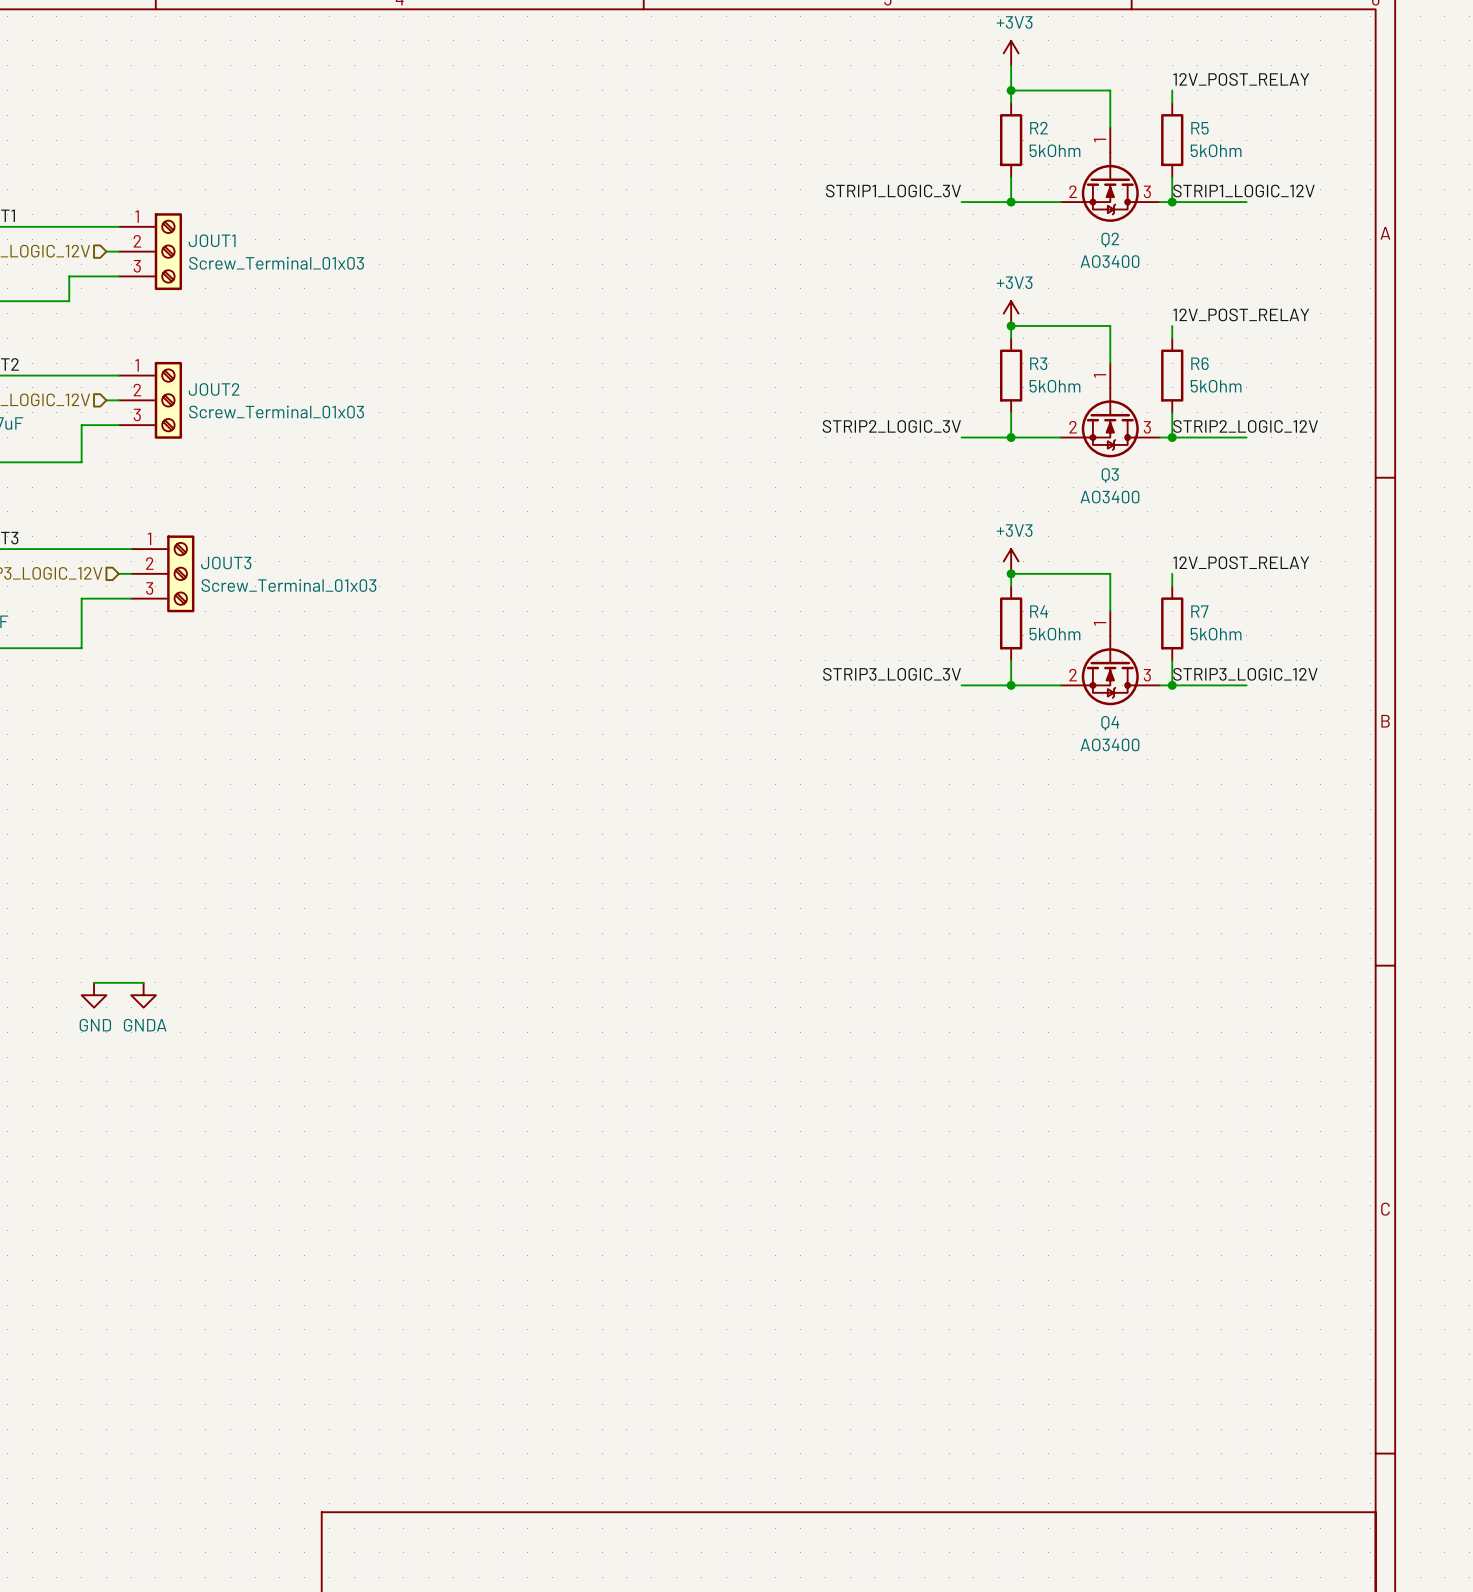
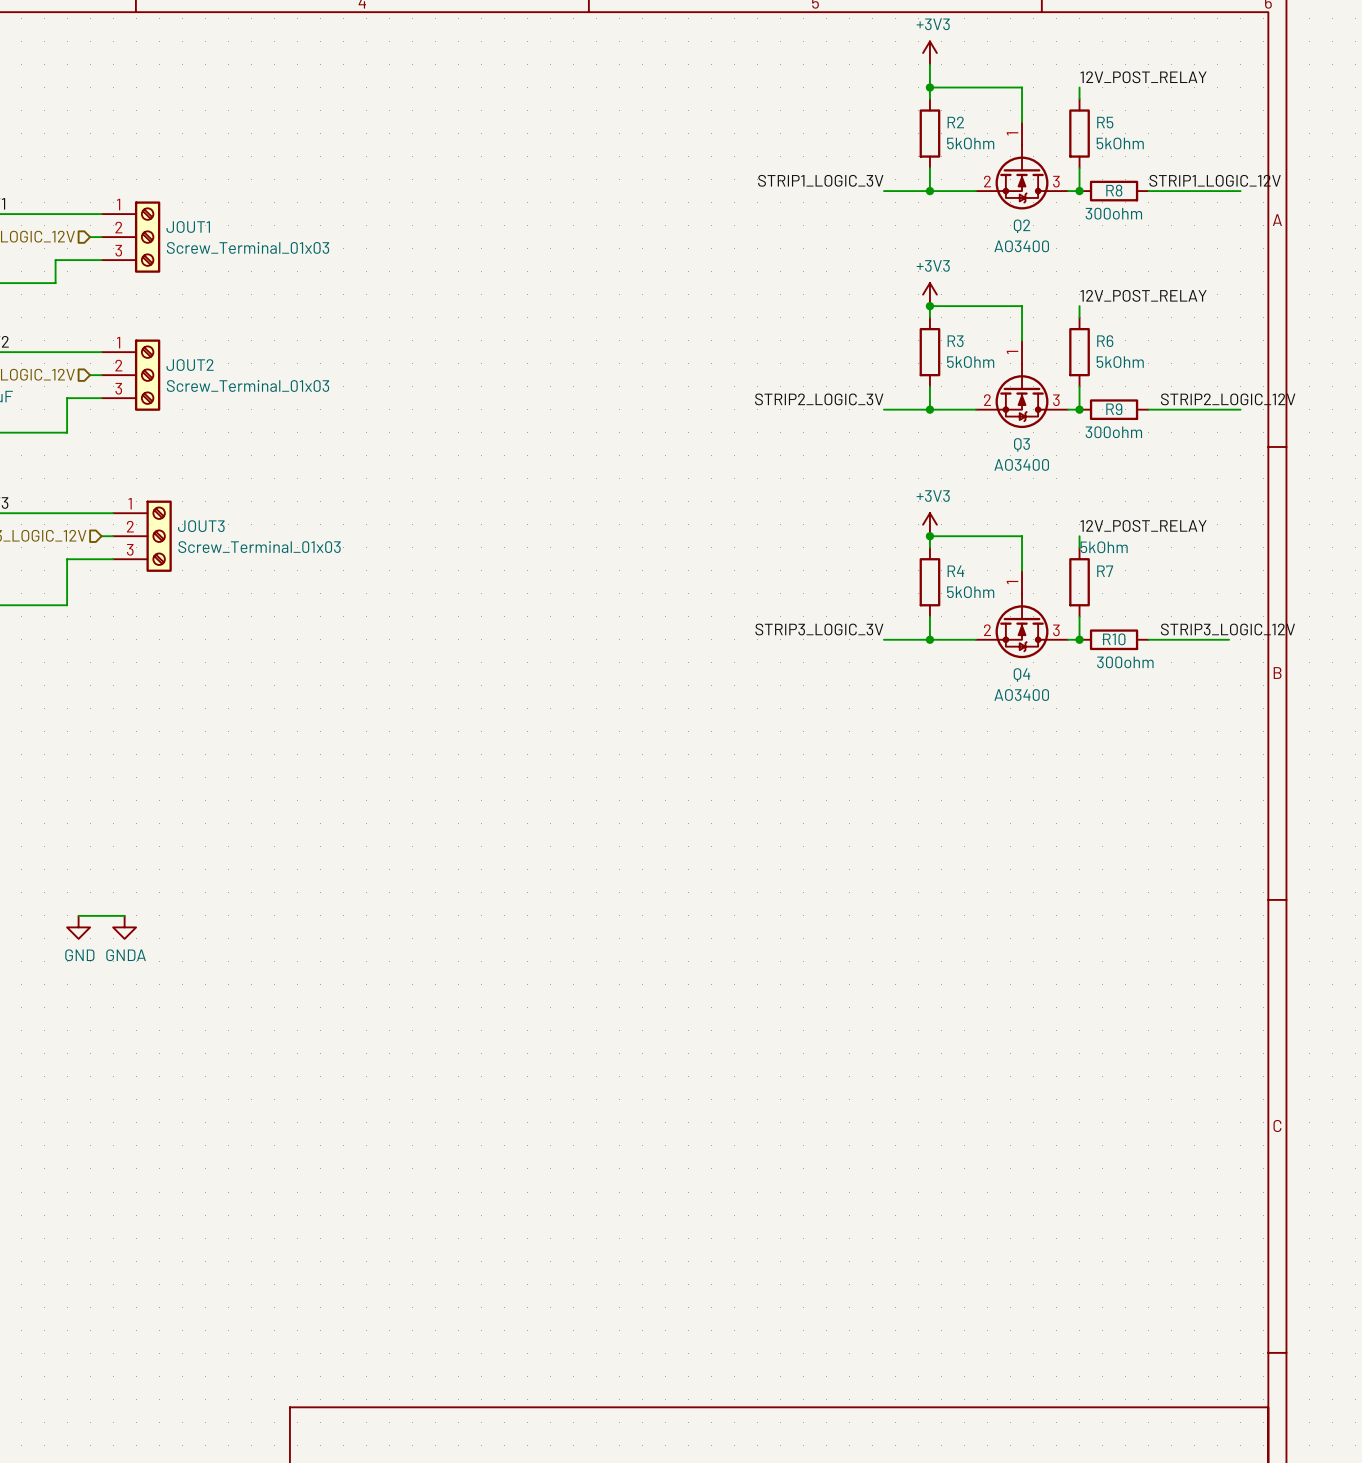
label position: STRIP1_LOGIC_12V (1243, 191) -> STRIP1_LOGIC_12V (1215, 180)
wire: (1172, 202) (1246, 202) -> (1240, 191) (1148, 191)
R8: none -> 300ohm (1114, 191)
label position: STRIP2_LOGIC_12V (1245, 426) -> STRIP2_LOGIC_12V (1228, 399)
wire: (1172, 437) (1246, 437) -> (1240, 409) (1148, 409)
R9: none -> 300ohm (1114, 409)
R7 value position: 5kOhm (1216, 634) -> 5kOhm (1104, 547)
label position: STRIP3_LOGIC_12V (1245, 674) -> STRIP3_LOGIC_12V (1227, 629)
wire: (1172, 685) (1246, 685) -> (1229, 639) (1148, 639)
R10: none -> 300ohm (1114, 639)

